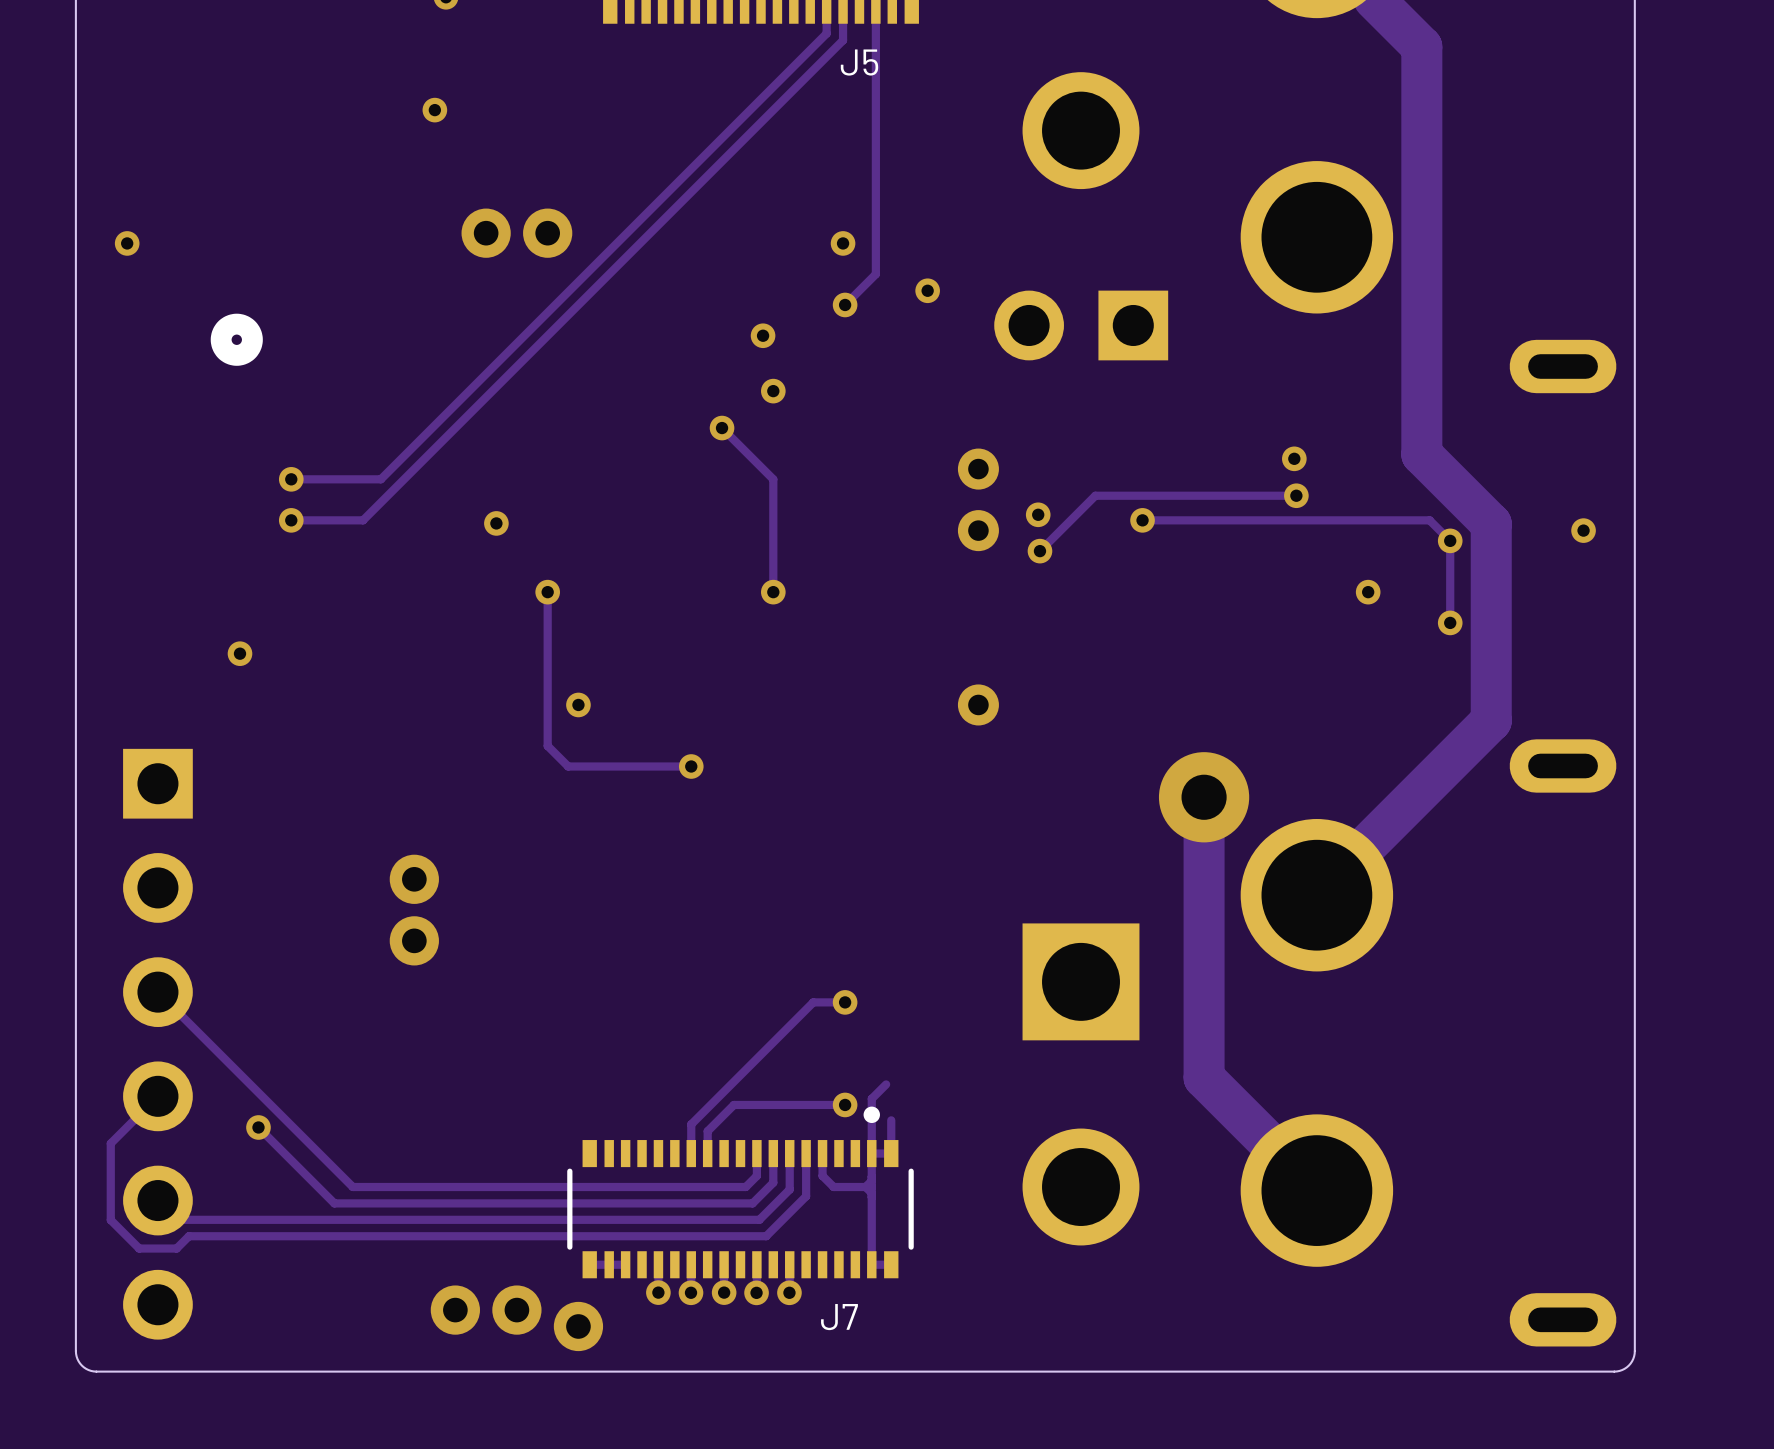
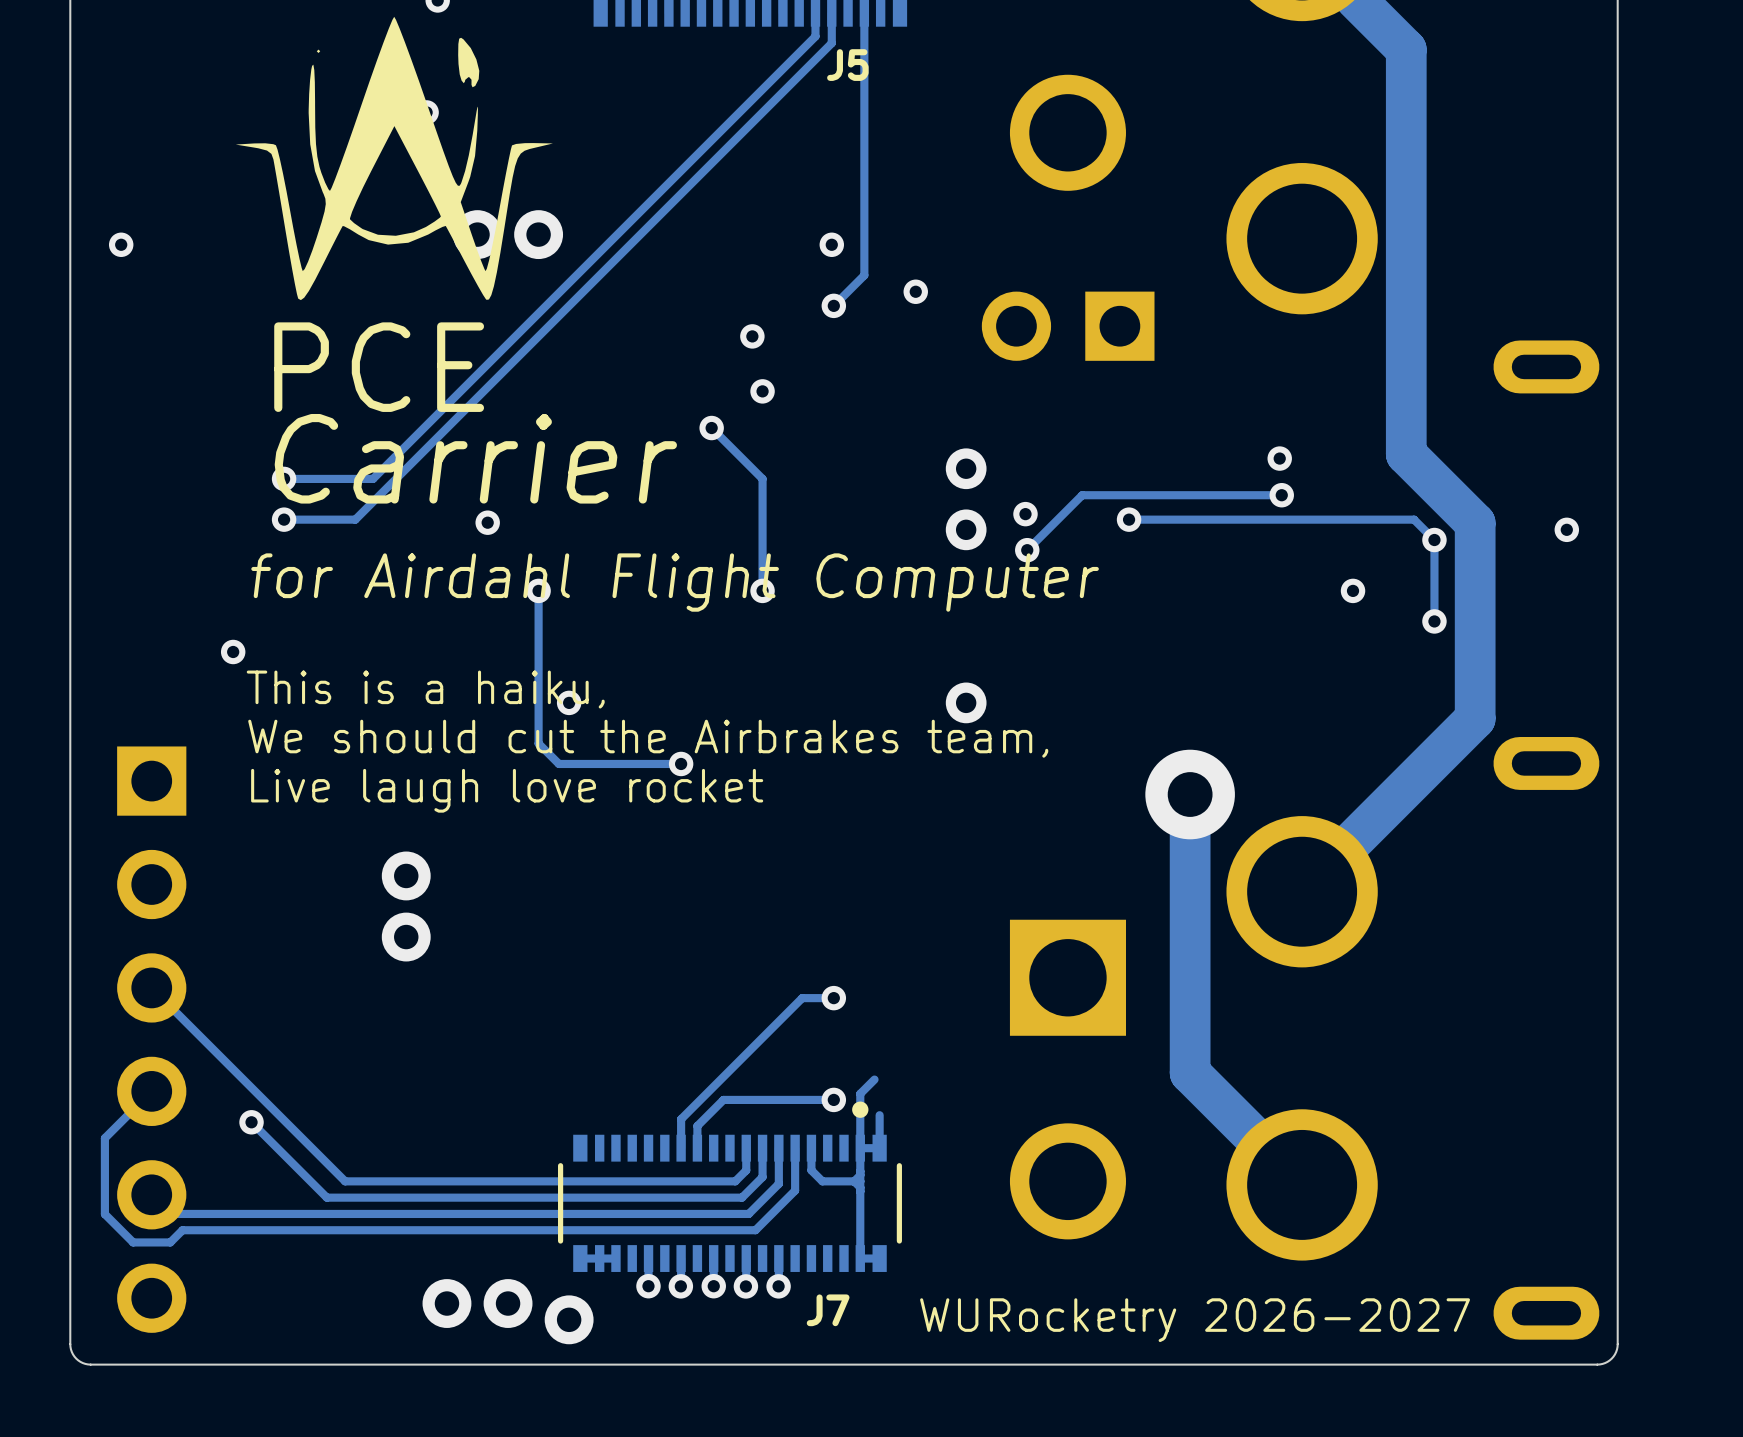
drawing: none -> [235, 16, 553, 301]
part: (236, 339) -> none
text: none -> PCE (379, 367)
text: none -> Carrier (475, 458)
text: none -> for Airdahl Flight Computer (675, 582)
text: none -> This is a haiku, (425, 689)
text: none -> We should cut the Airbrakes team, (648, 738)
text: none -> Live laugh love rocket (507, 790)
text: none -> WURocketry 2026-2027 (1195, 1320)

